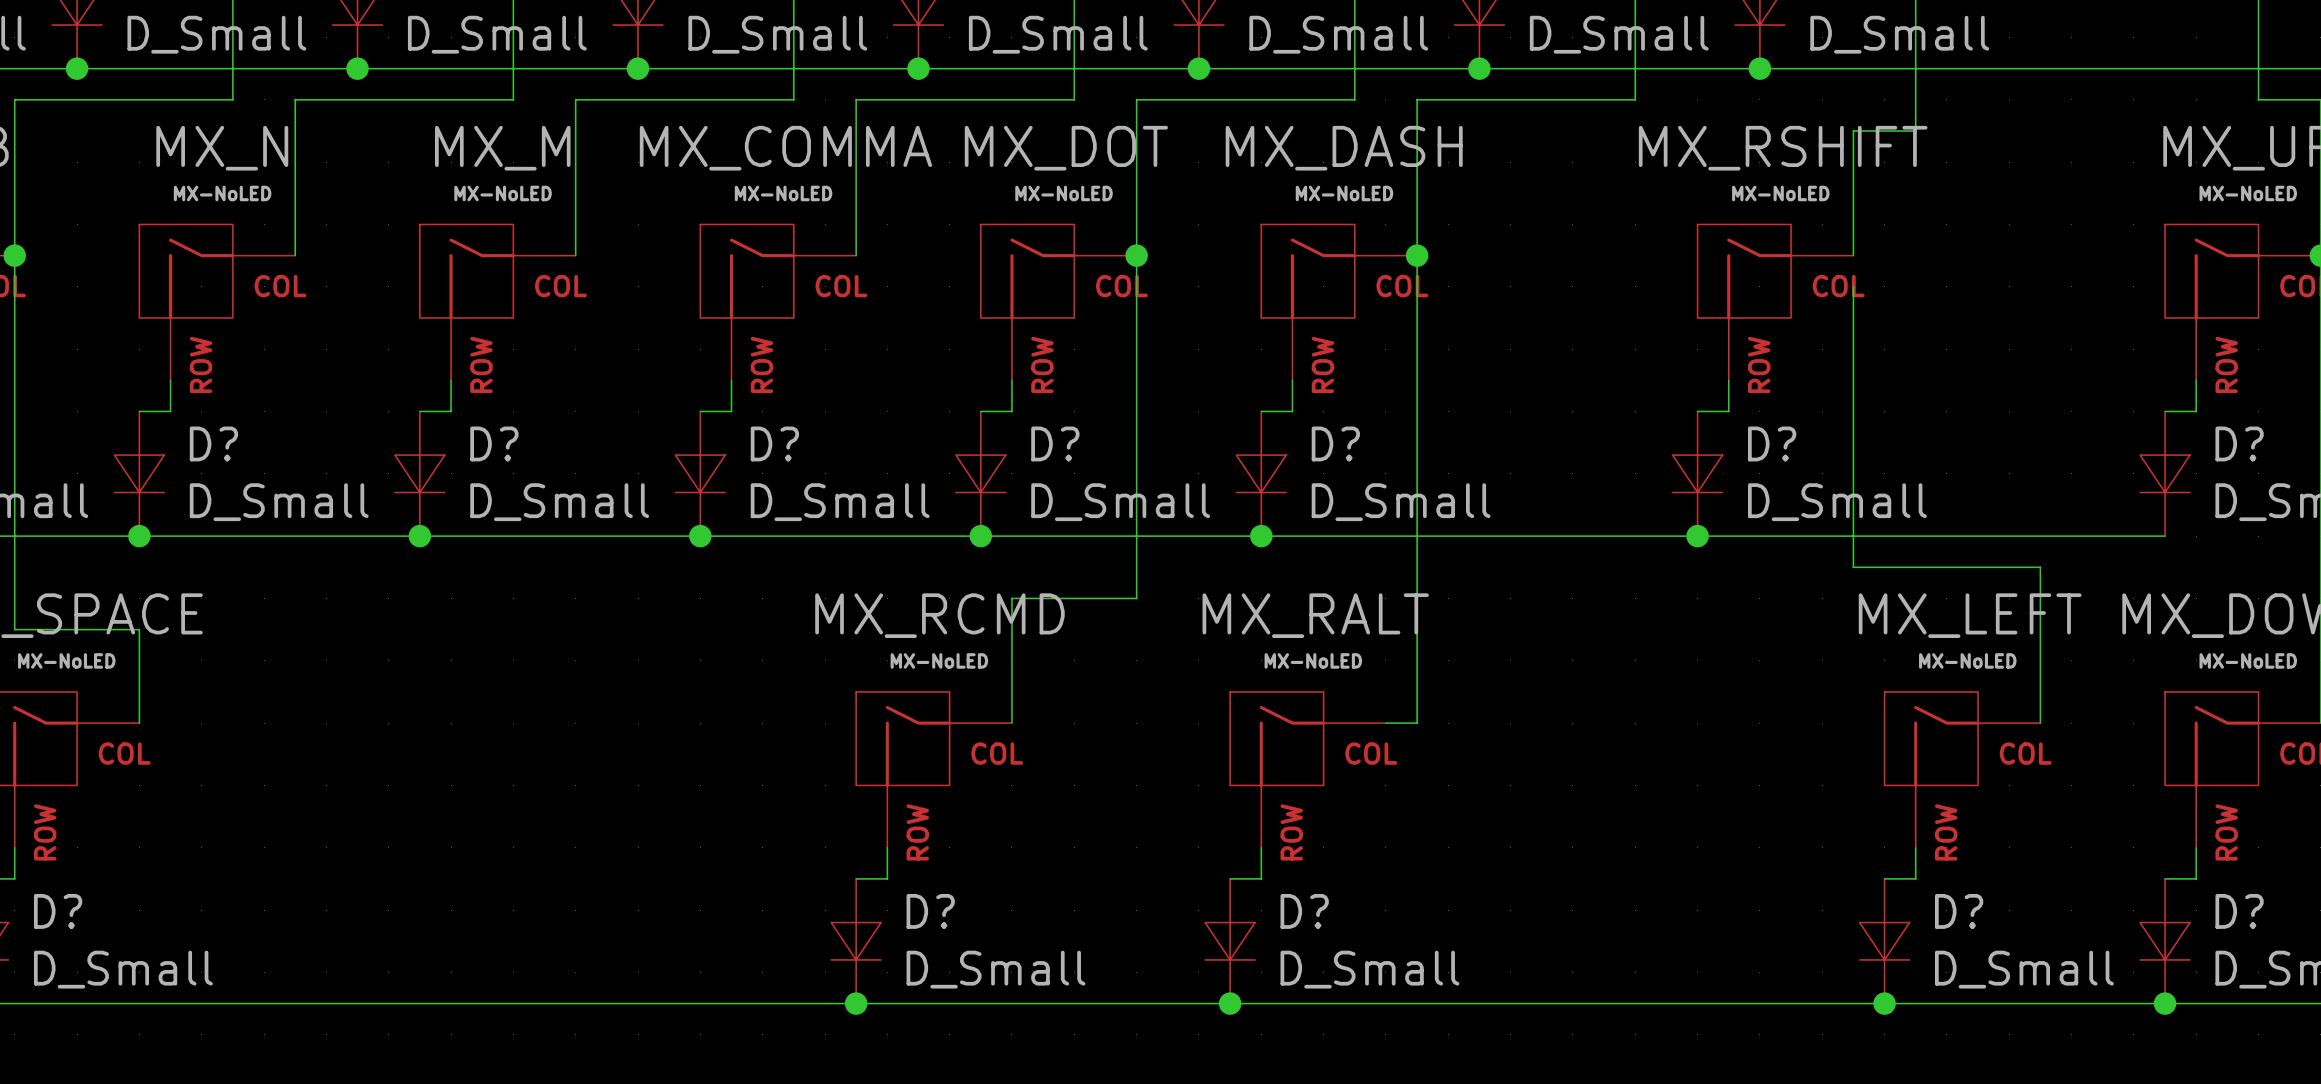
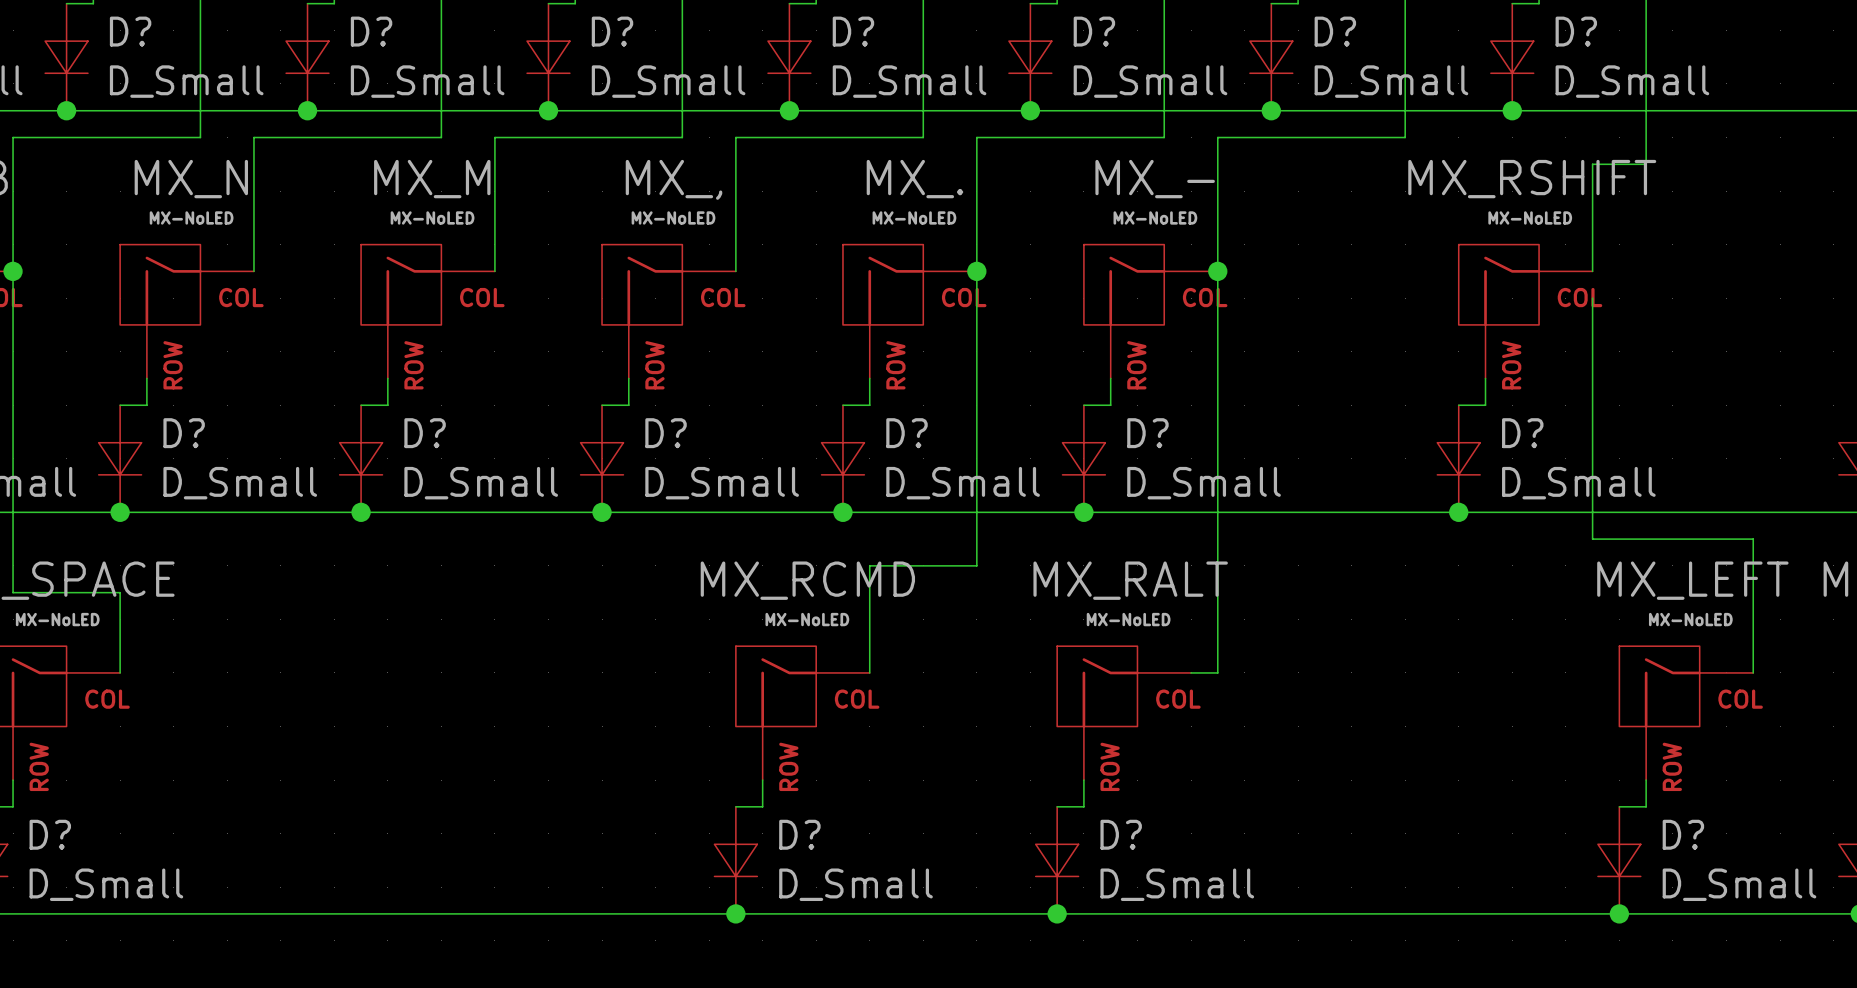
MX_COMMA name: MX_COMMA (785, 148) -> MX_, (674, 179)
MX_DOT name: MX_DOT (1066, 148) -> MX_. (914, 179)
MX_DASH name: MX_DASH (1344, 148) -> MX_- (1155, 179)

